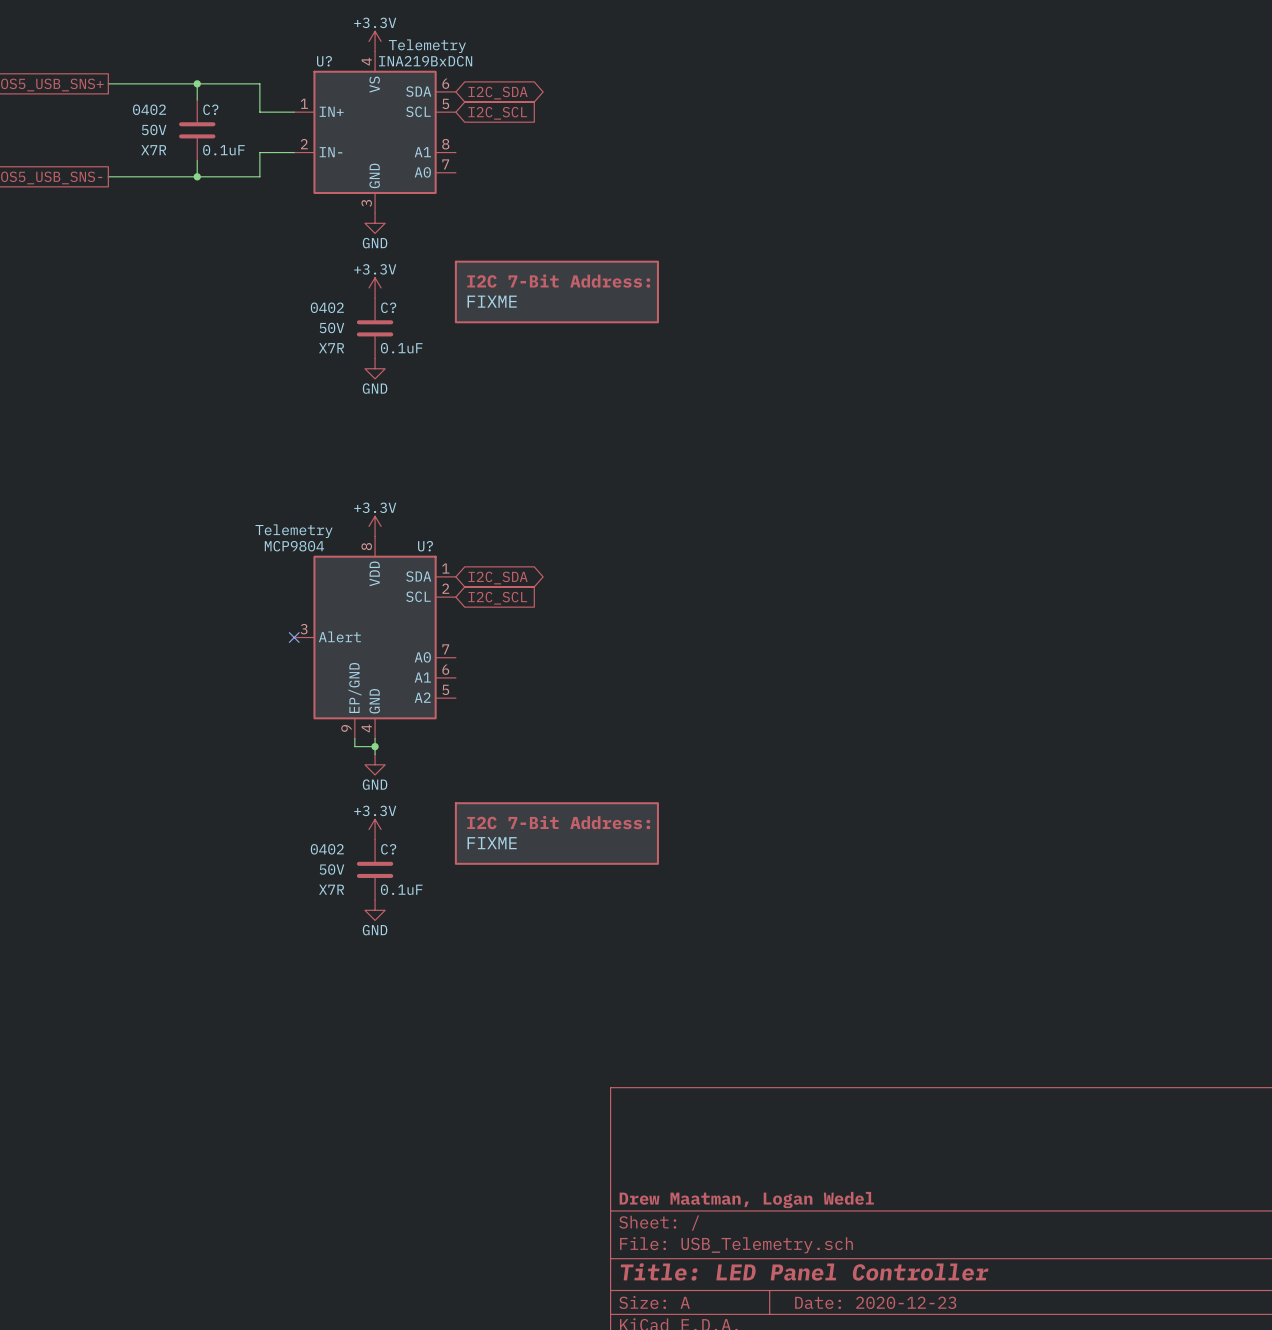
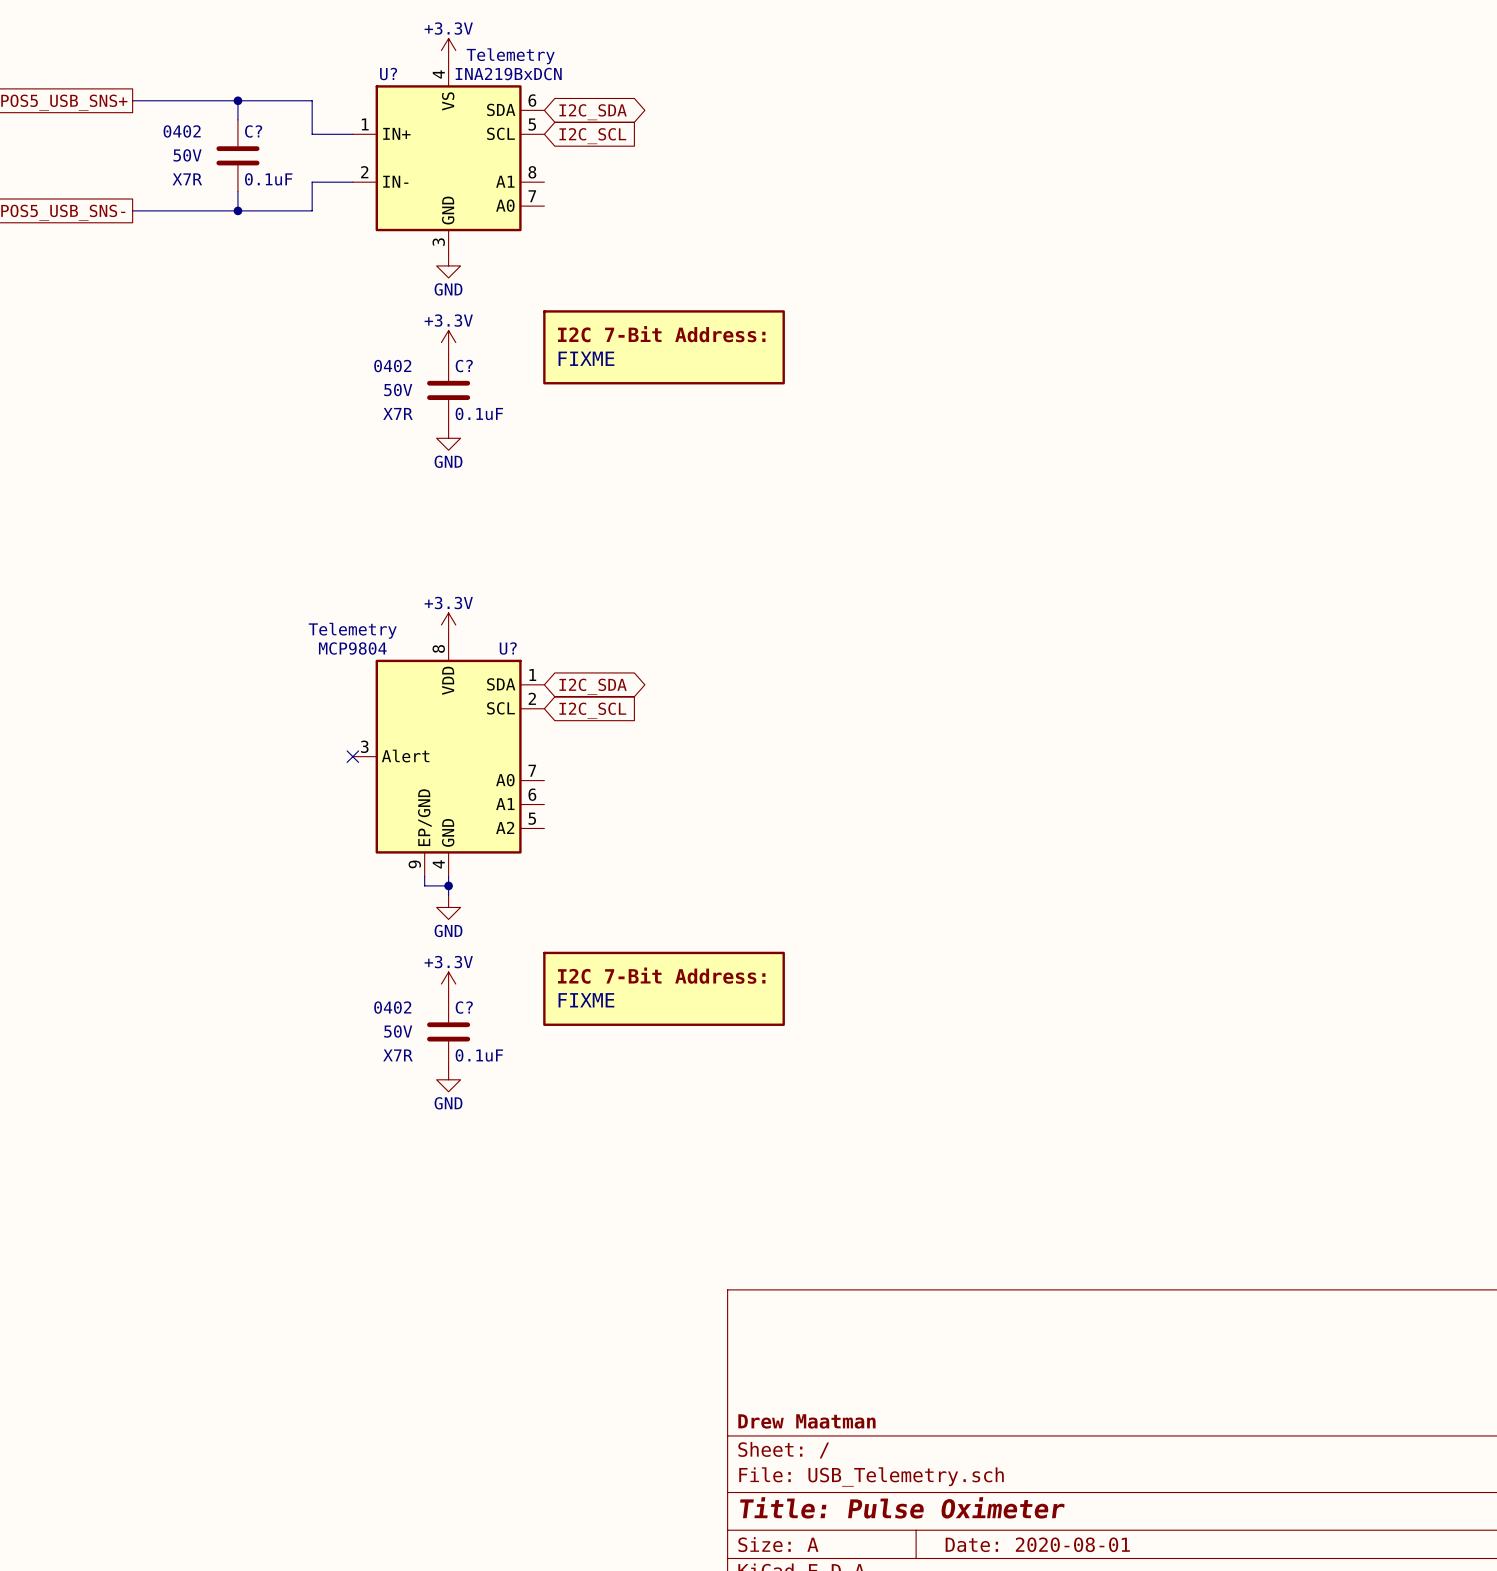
title block: Drew Maatman, Logan Wedel (746, 1200) -> Drew Maatman (806, 1421)
title block: Title: LED Panel Controller (804, 1271) -> Title: Pulse Oximeter (902, 1507)
title block: Date: 2020-12-23 (875, 1302) -> Date: 2020-08-01 (1037, 1544)

